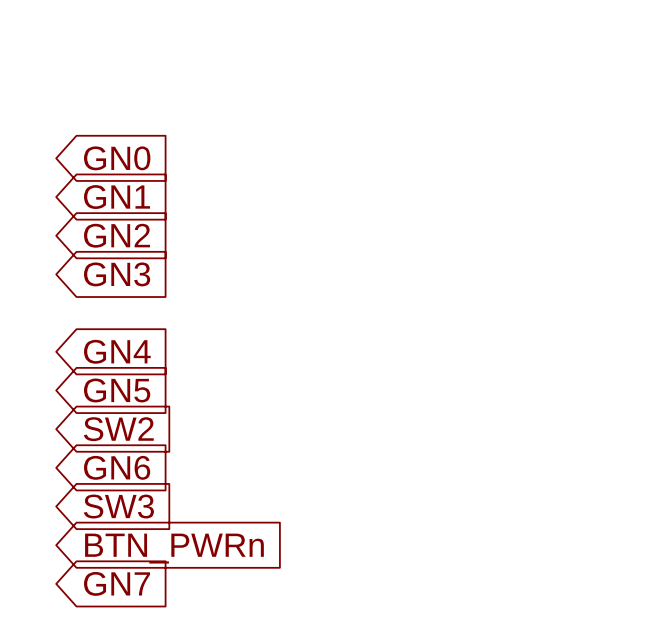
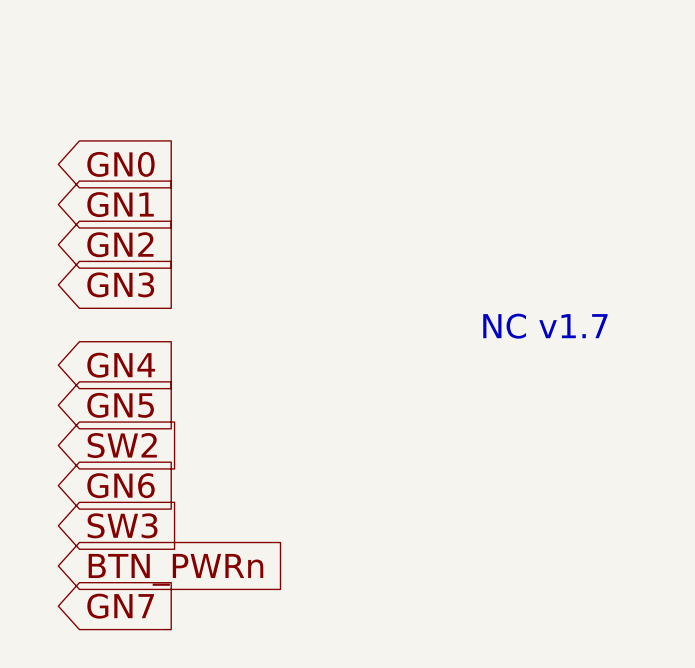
text: none -> NC v1.7 (545, 326)

